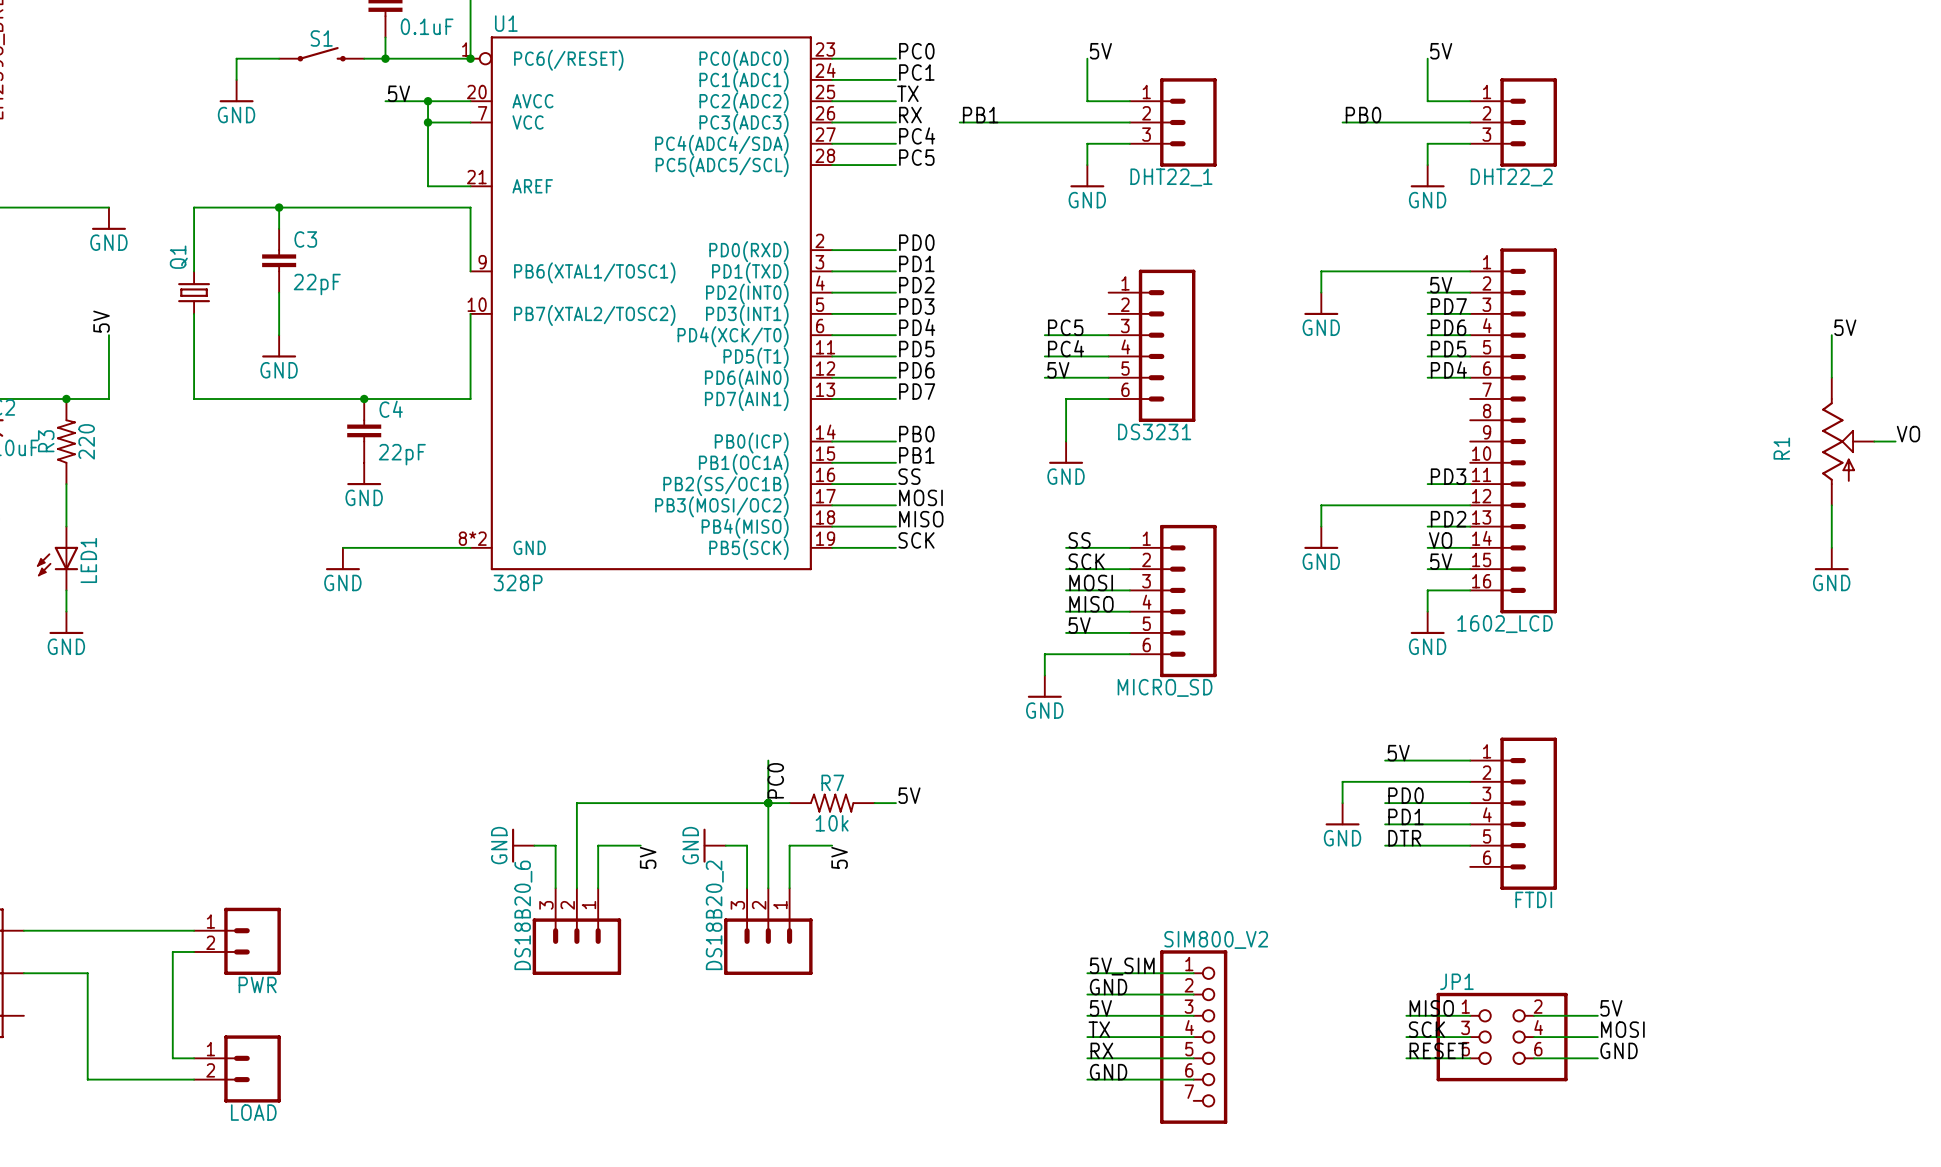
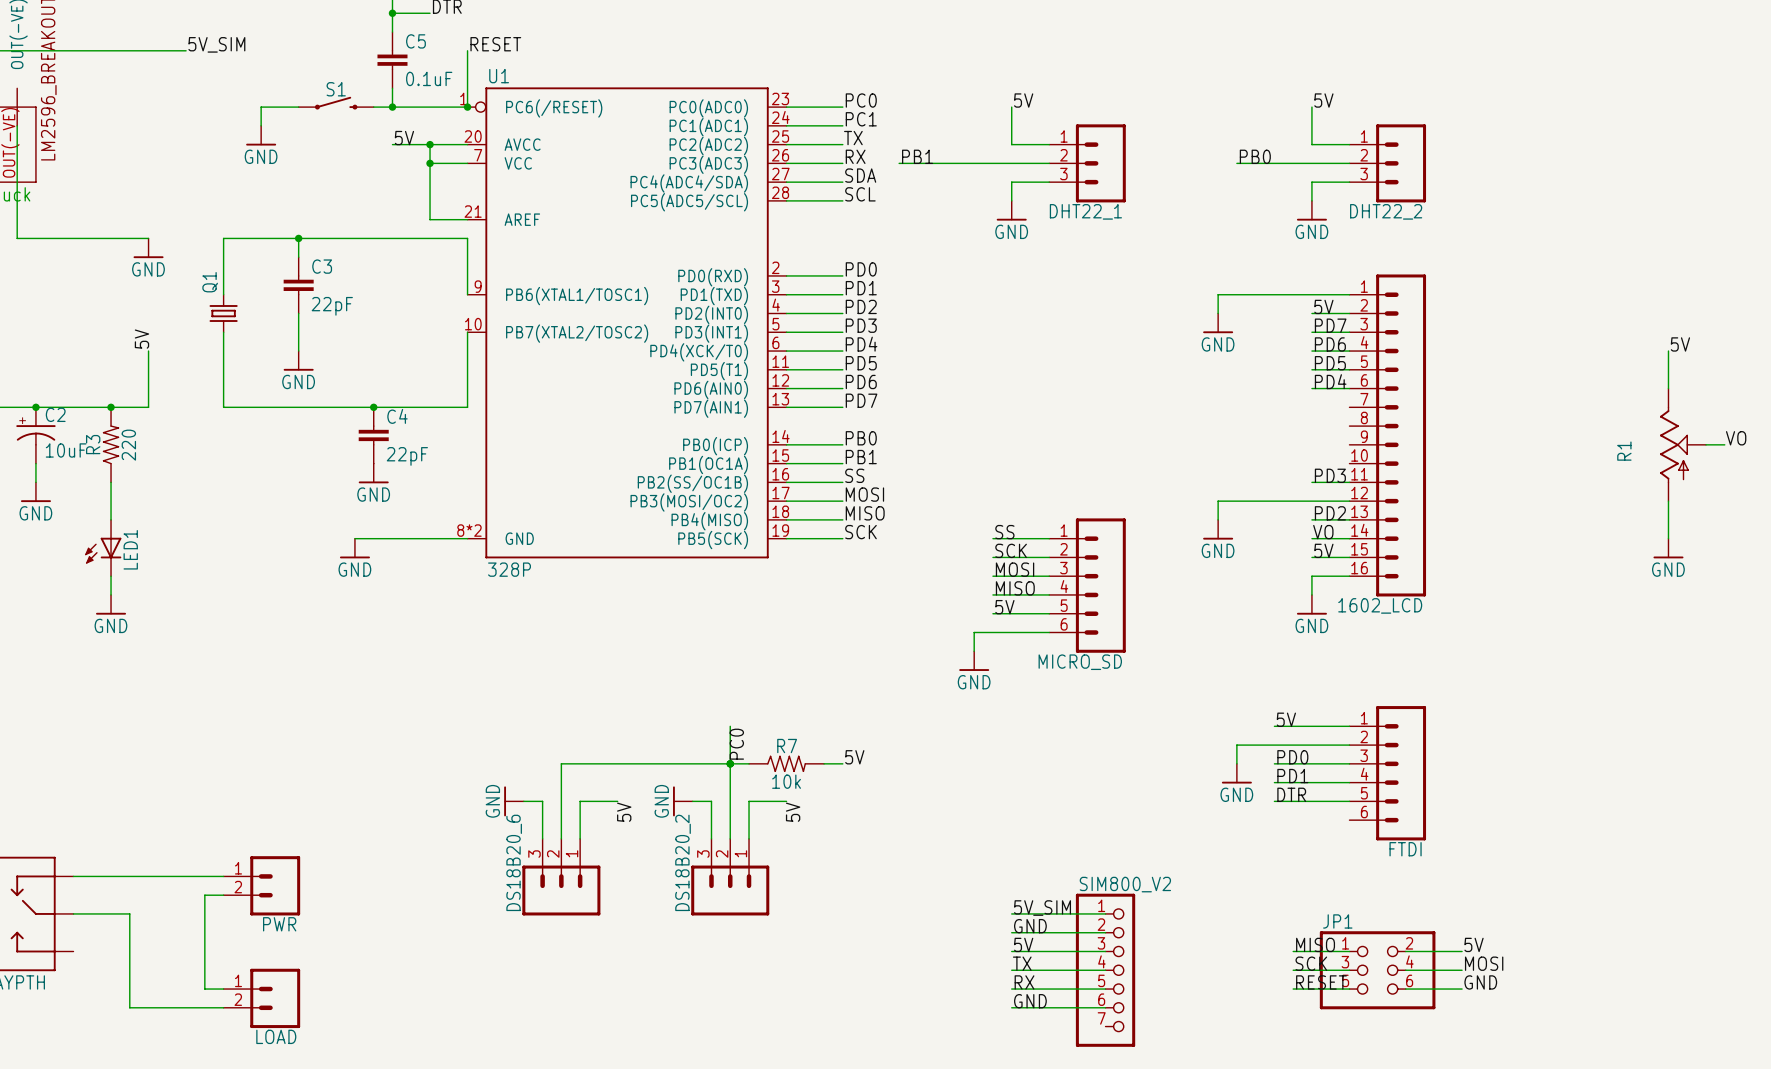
label: PC4 (917, 135) -> SDA (860, 175)
label: PC5 (916, 157) -> SCL (860, 194)
label: PC5 (1065, 327) -> none
wire: (1044, 335) (1108, 335) -> none
DS3231: (1152, 345) -> none
label: PC4 (1066, 348) -> none
wire: (1044, 356) (1108, 356) -> none
label: 5V (1058, 370) -> none
wire: (1044, 377) (1108, 377) -> none
wire: (1108, 398) (1066, 398) (1066, 441) -> none
power symbol: GND (1066, 452) -> none

